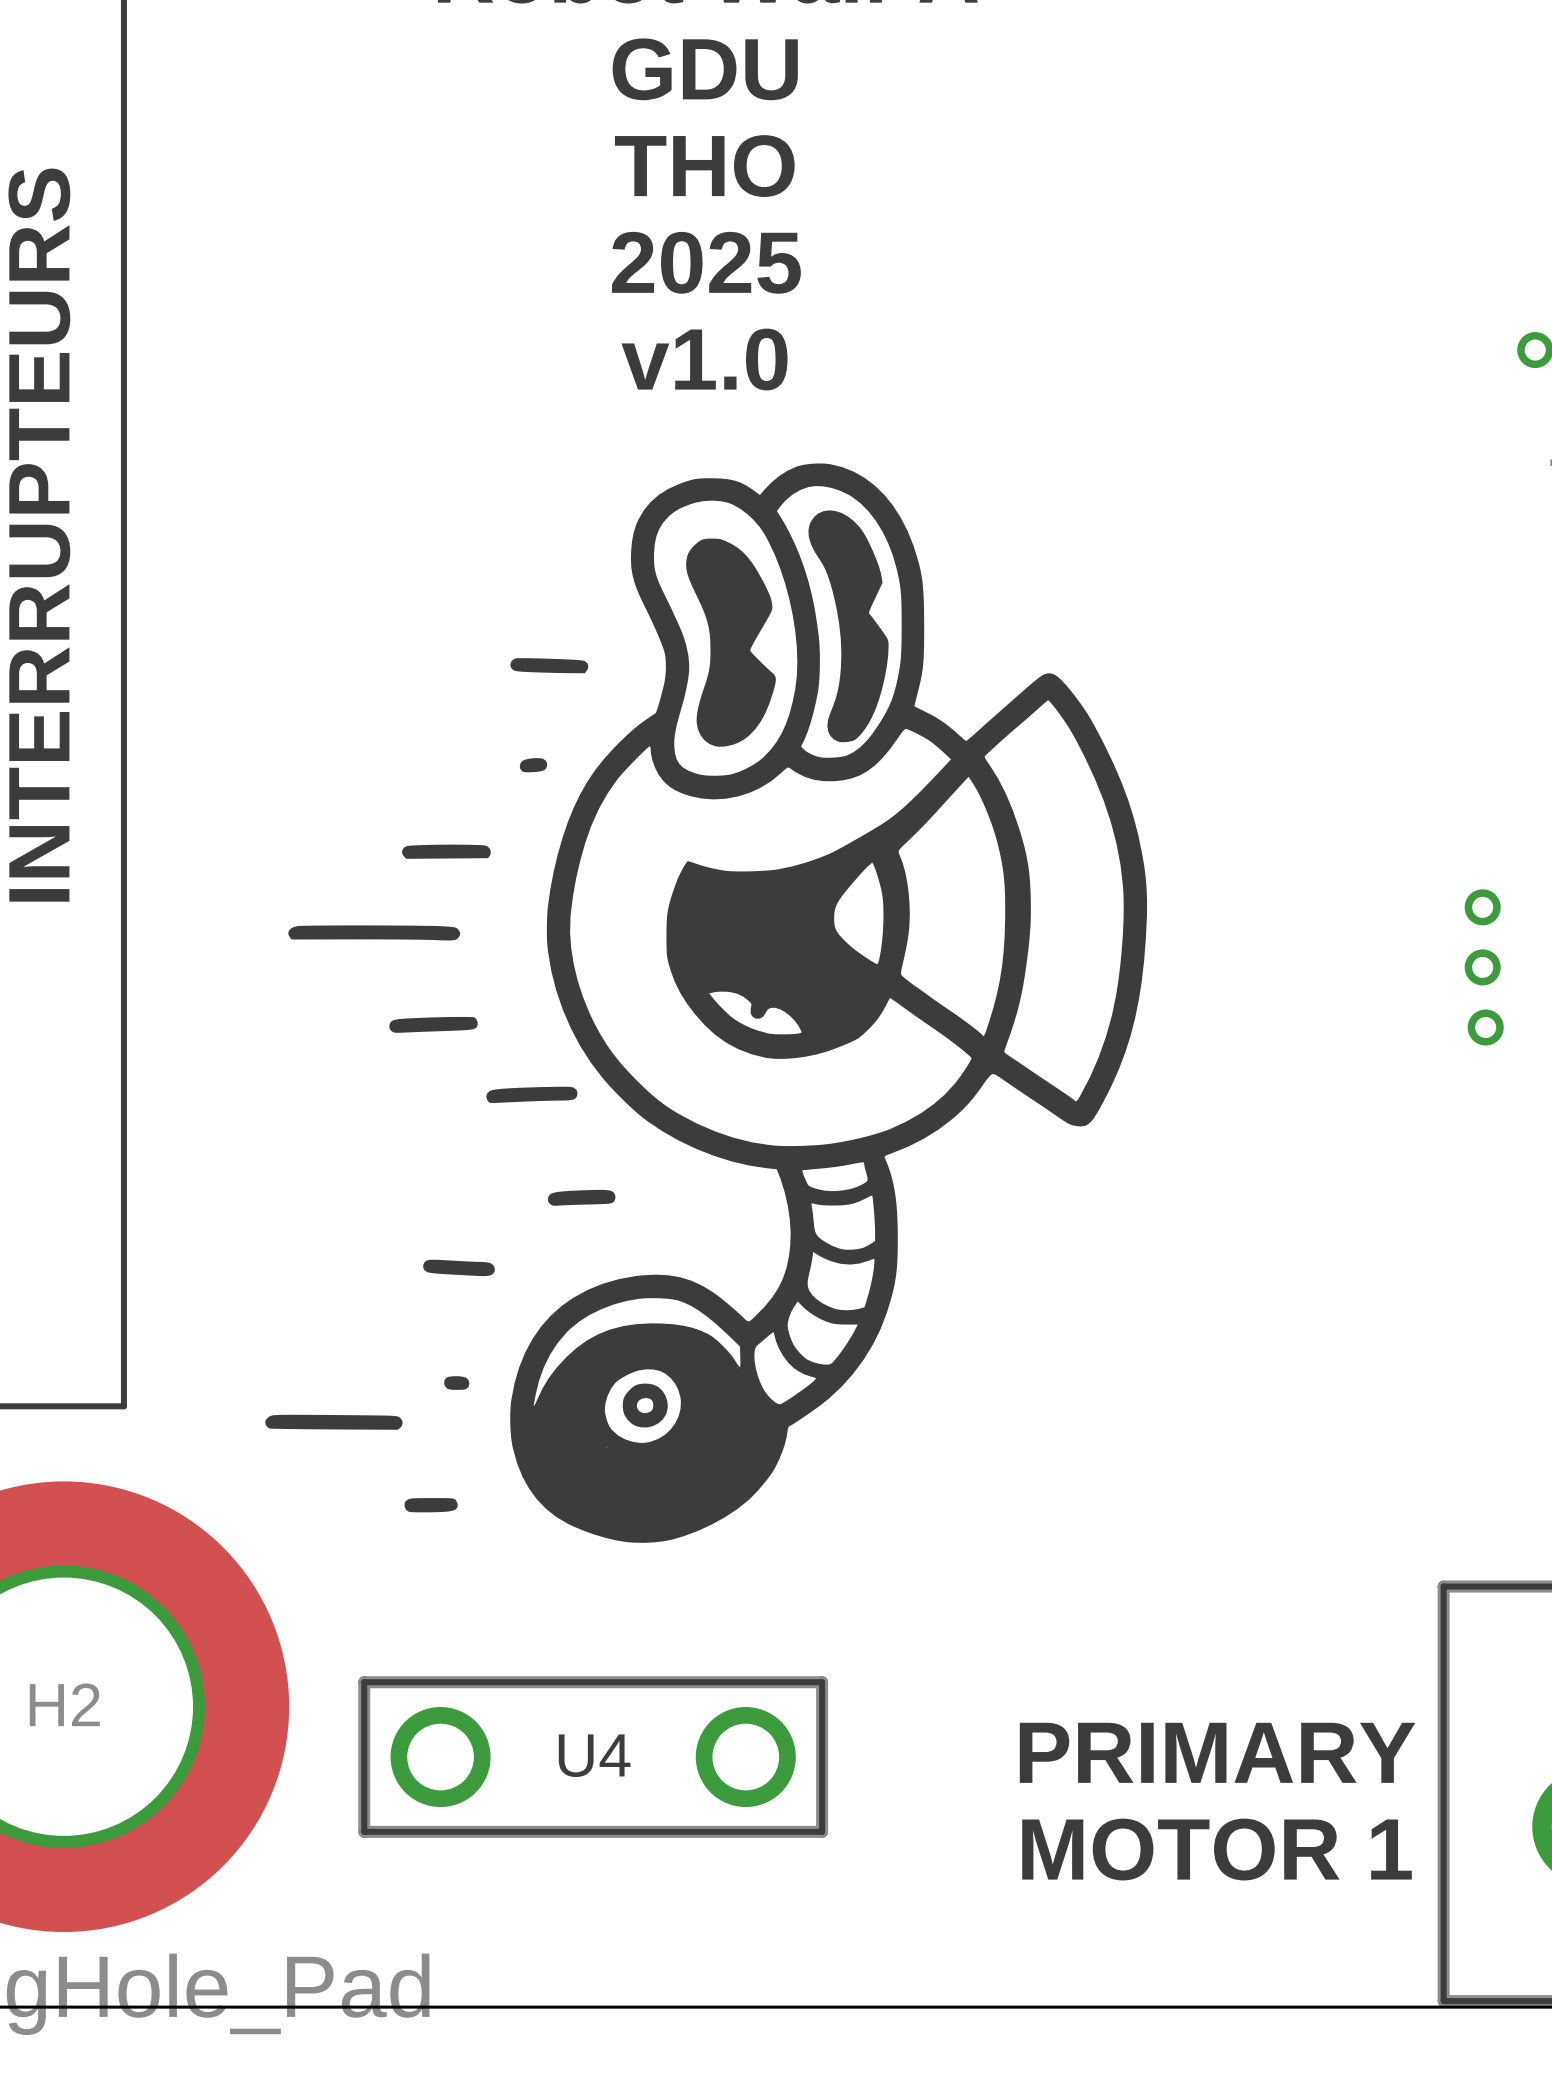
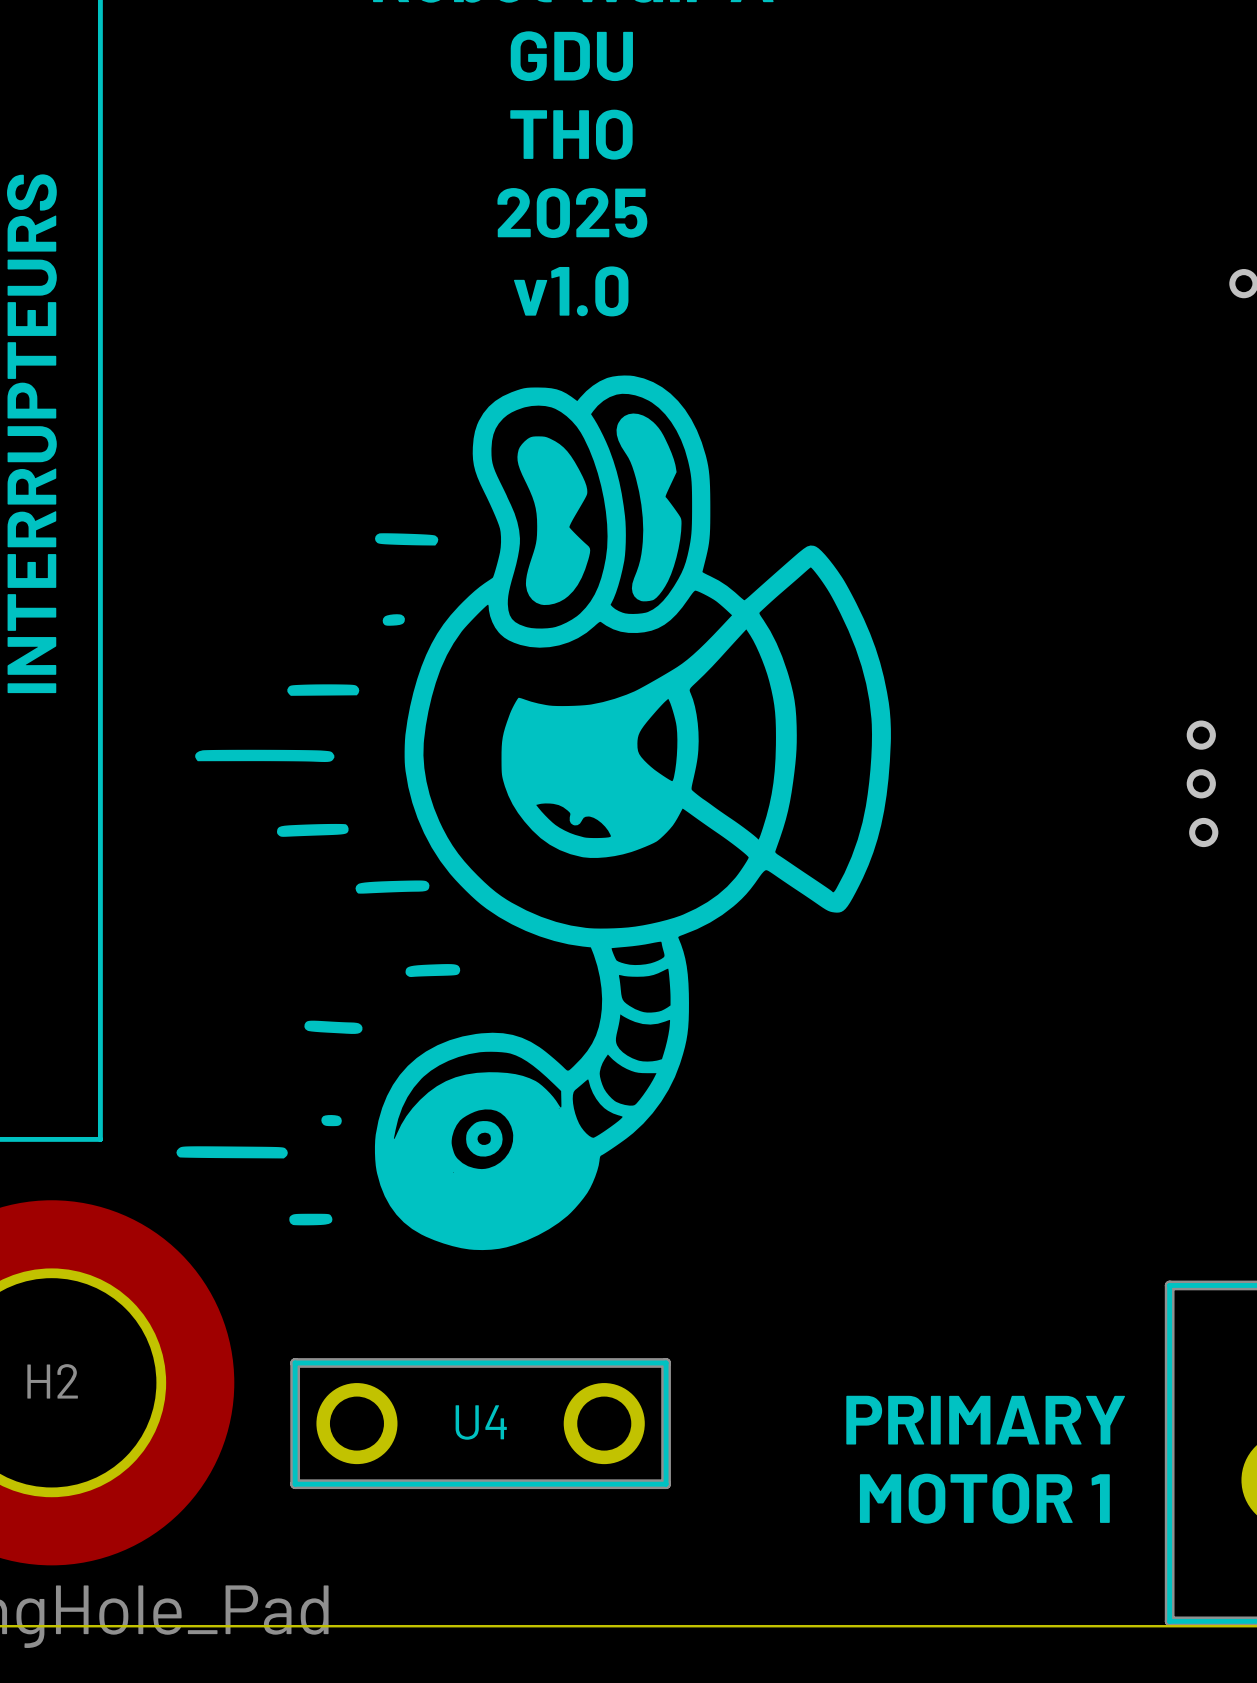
drawing position: (706, 1003) -> (533, 812)

